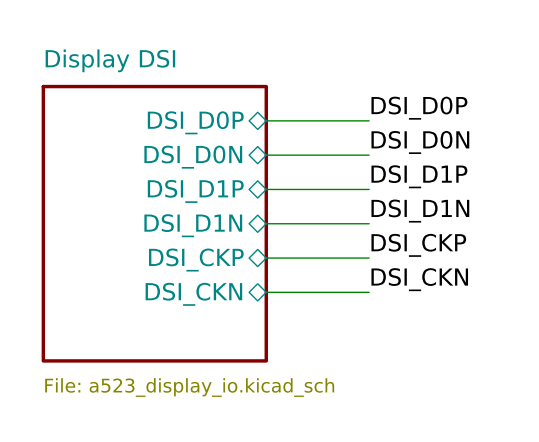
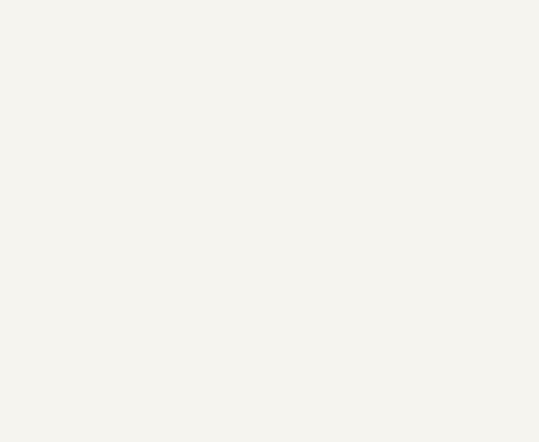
label: DSI_D0P (419, 108) -> none
wire: (266, 120) (369, 120) -> none
sheet pin: DSI_D0P (195, 122) -> none
label: DSI_D0N (420, 142) -> none
wire: (266, 155) (369, 155) -> none
sheet pin: DSI_D0N (193, 157) -> none
label: DSI_D1P (419, 176) -> none
wire: (266, 189) (369, 189) -> none
sheet pin: DSI_D1P (195, 191) -> none
label: DSI_D1N (420, 211) -> none
sheet Display DSI: File: a523_display_io.kicad_sch (154, 223) -> none
wire: (266, 223) (369, 223) -> none
sheet pin: DSI_D1N (193, 225) -> none
label: DSI_CKP (418, 245) -> none
wire: (266, 258) (369, 258) -> none
sheet pin: DSI_CKP (196, 260) -> none
label: DSI_CKN (419, 279) -> none
wire: (266, 292) (369, 292) -> none
sheet pin: DSI_CKN (193, 294) -> none

